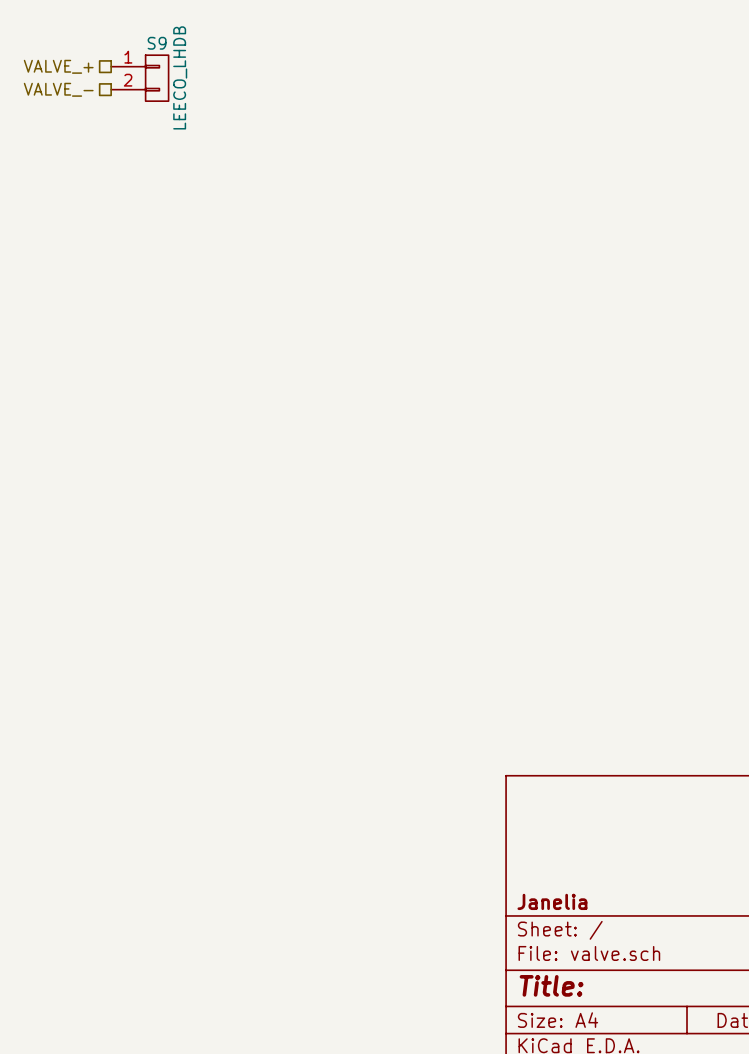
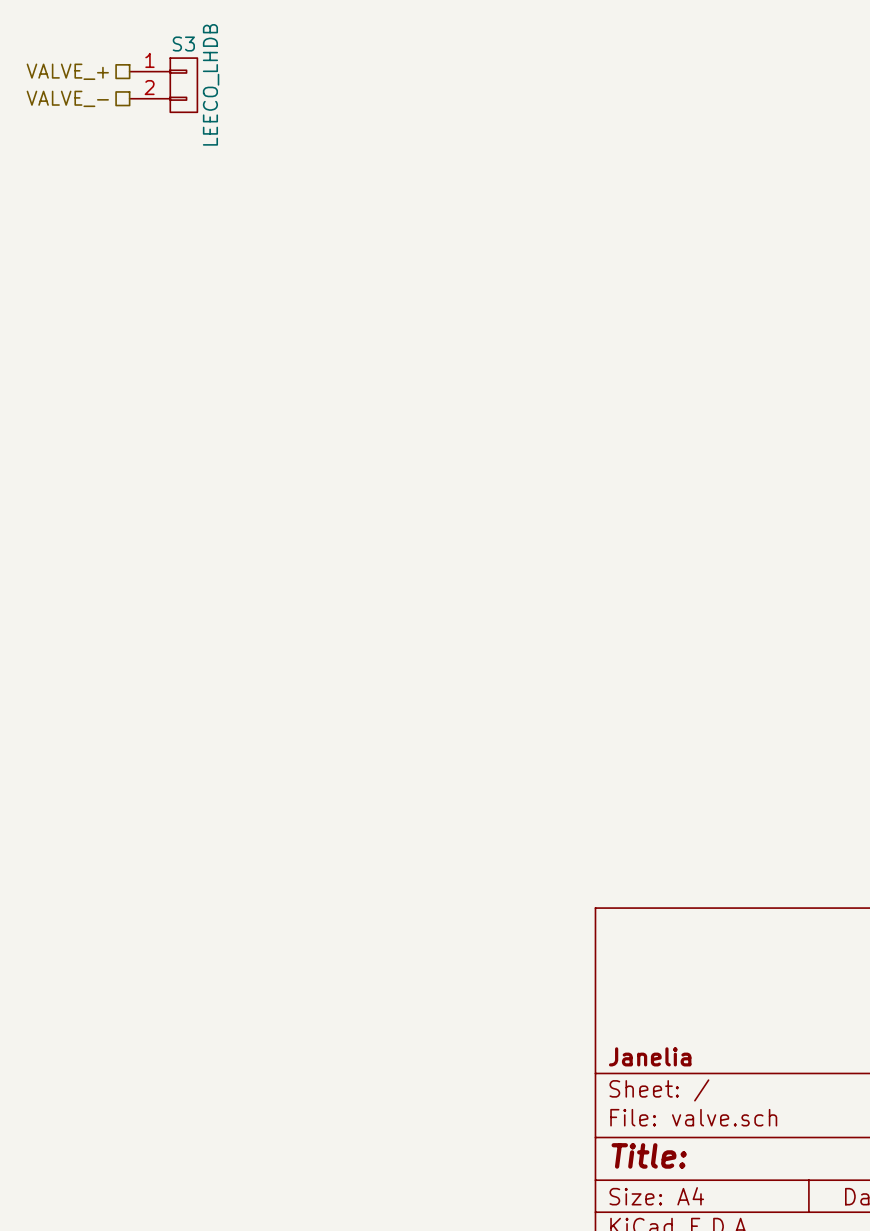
S9 name: S9 (157, 43) -> S3 (183, 44)

